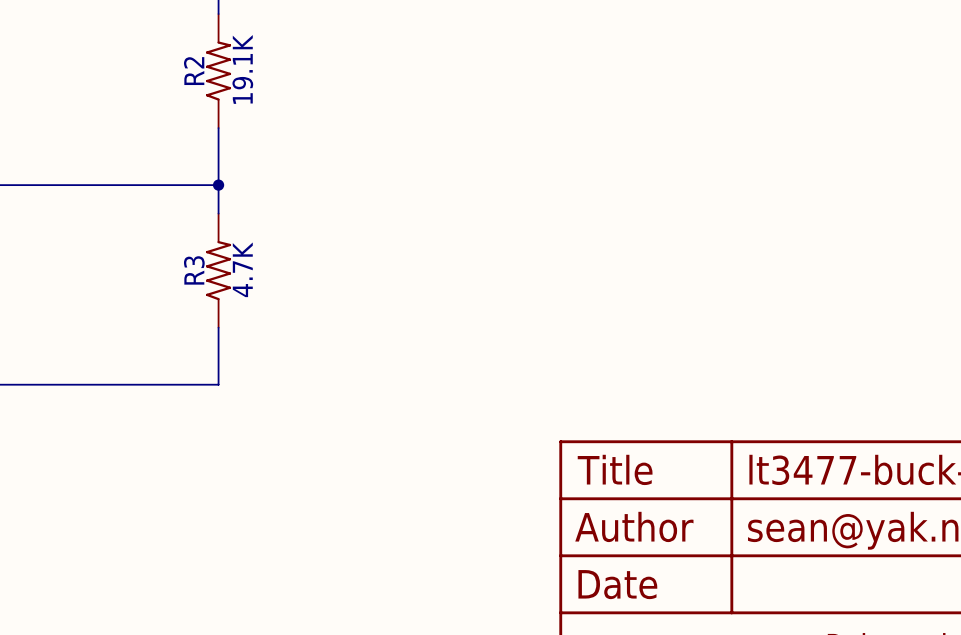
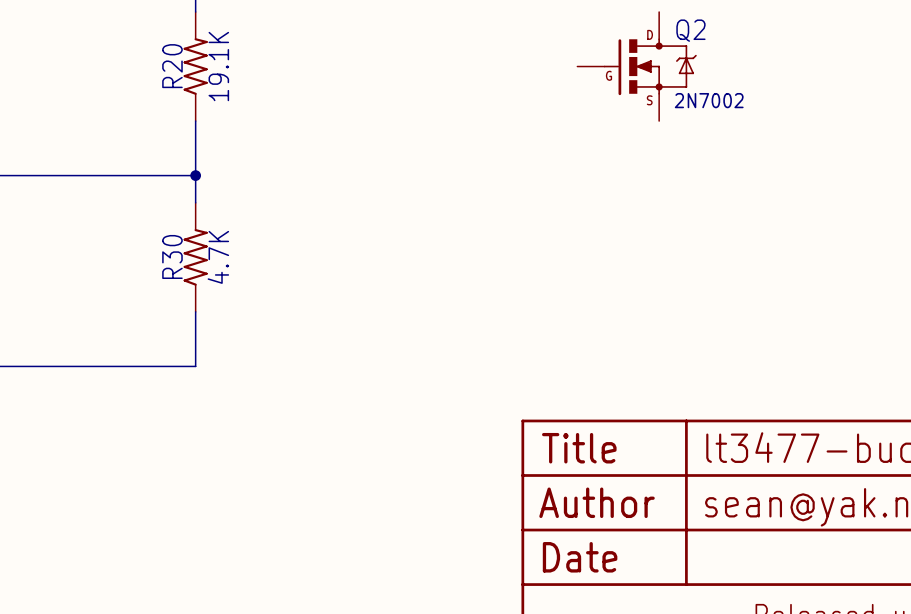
R2 name: R2 (194, 71) -> R20 (172, 66)
Q2: none -> 2N7002 (637, 66)
R3 name: R3 (194, 270) -> R30 (172, 256)

